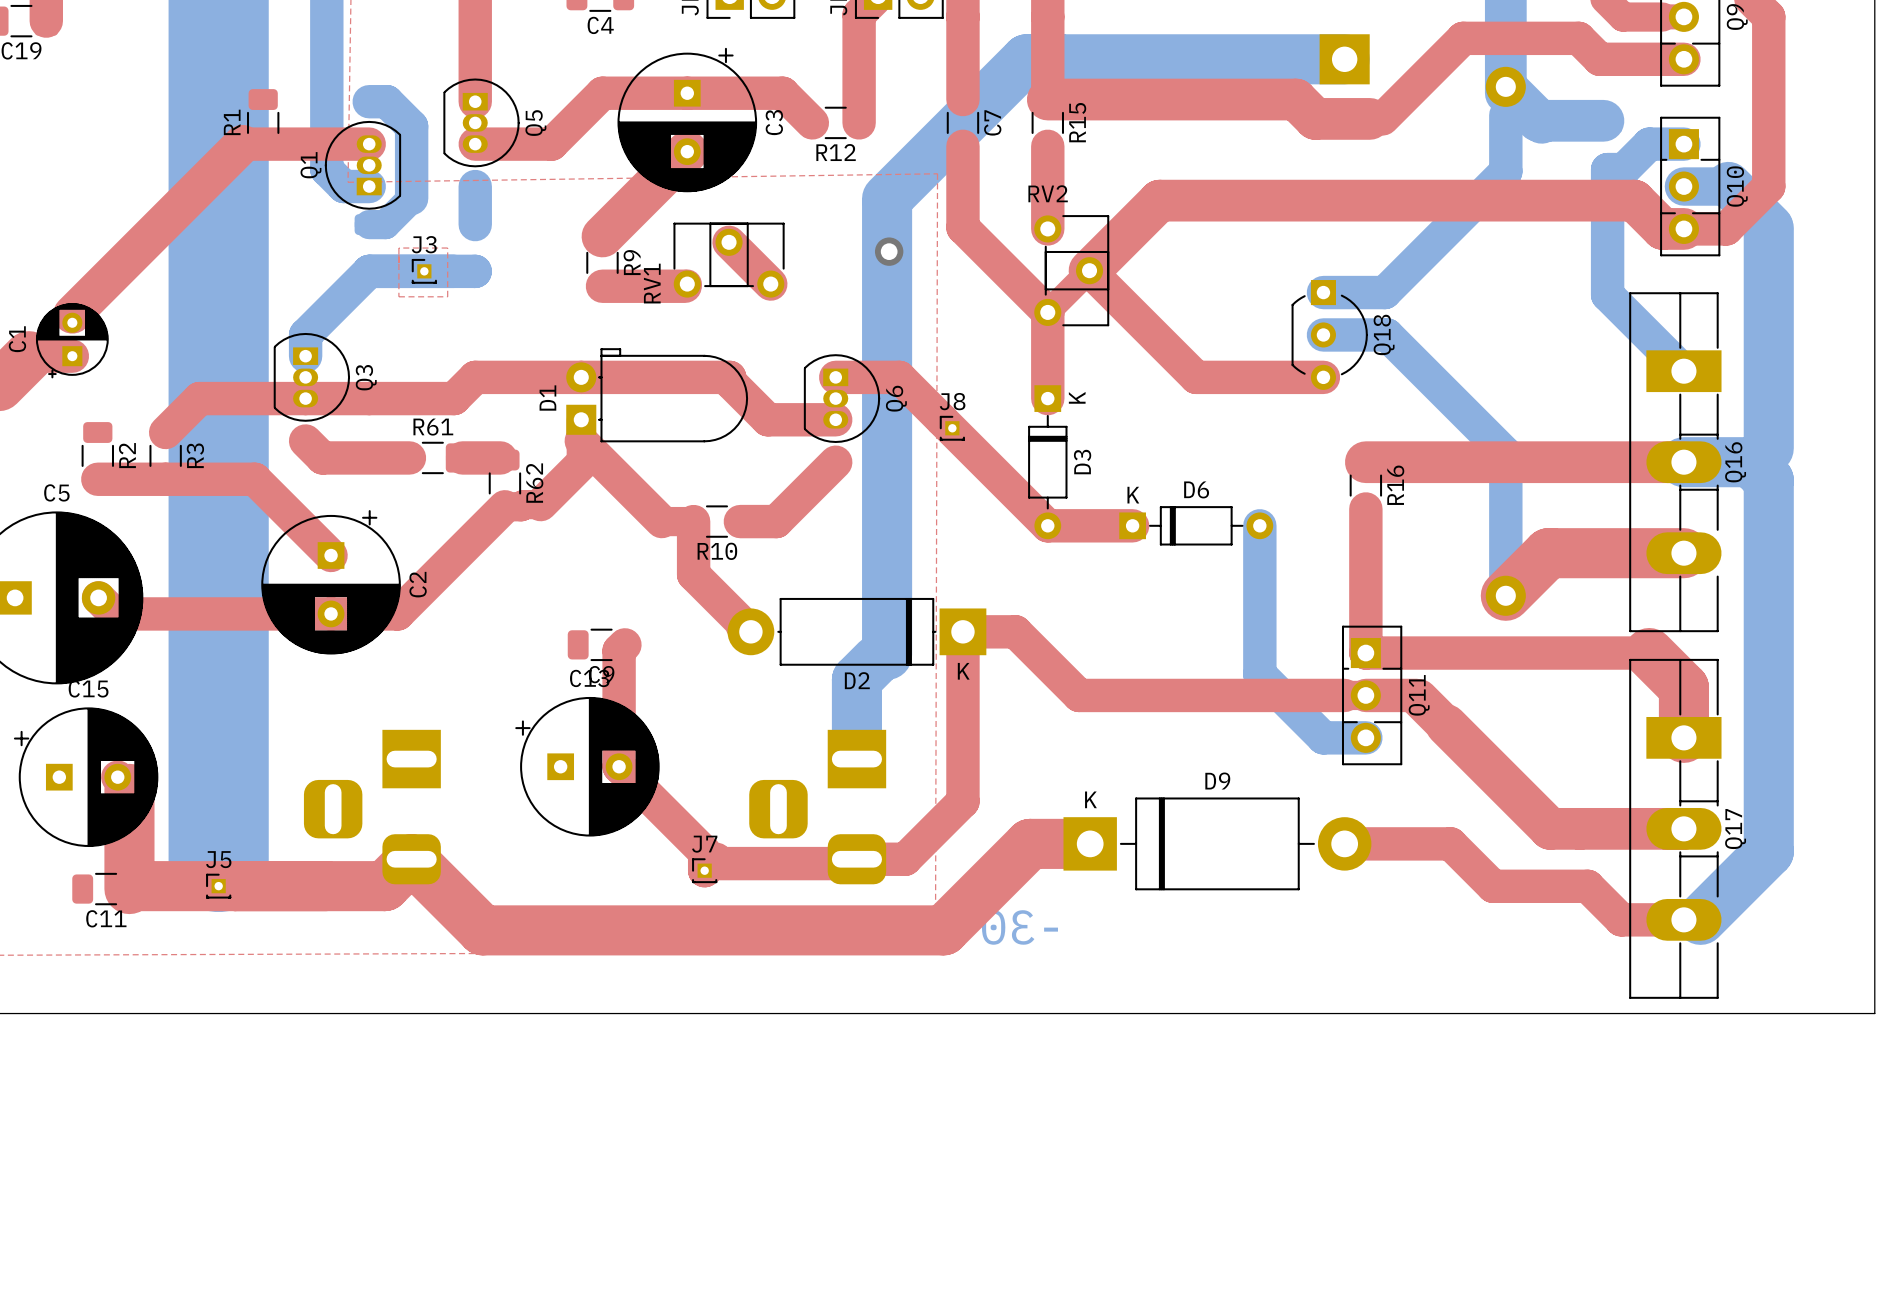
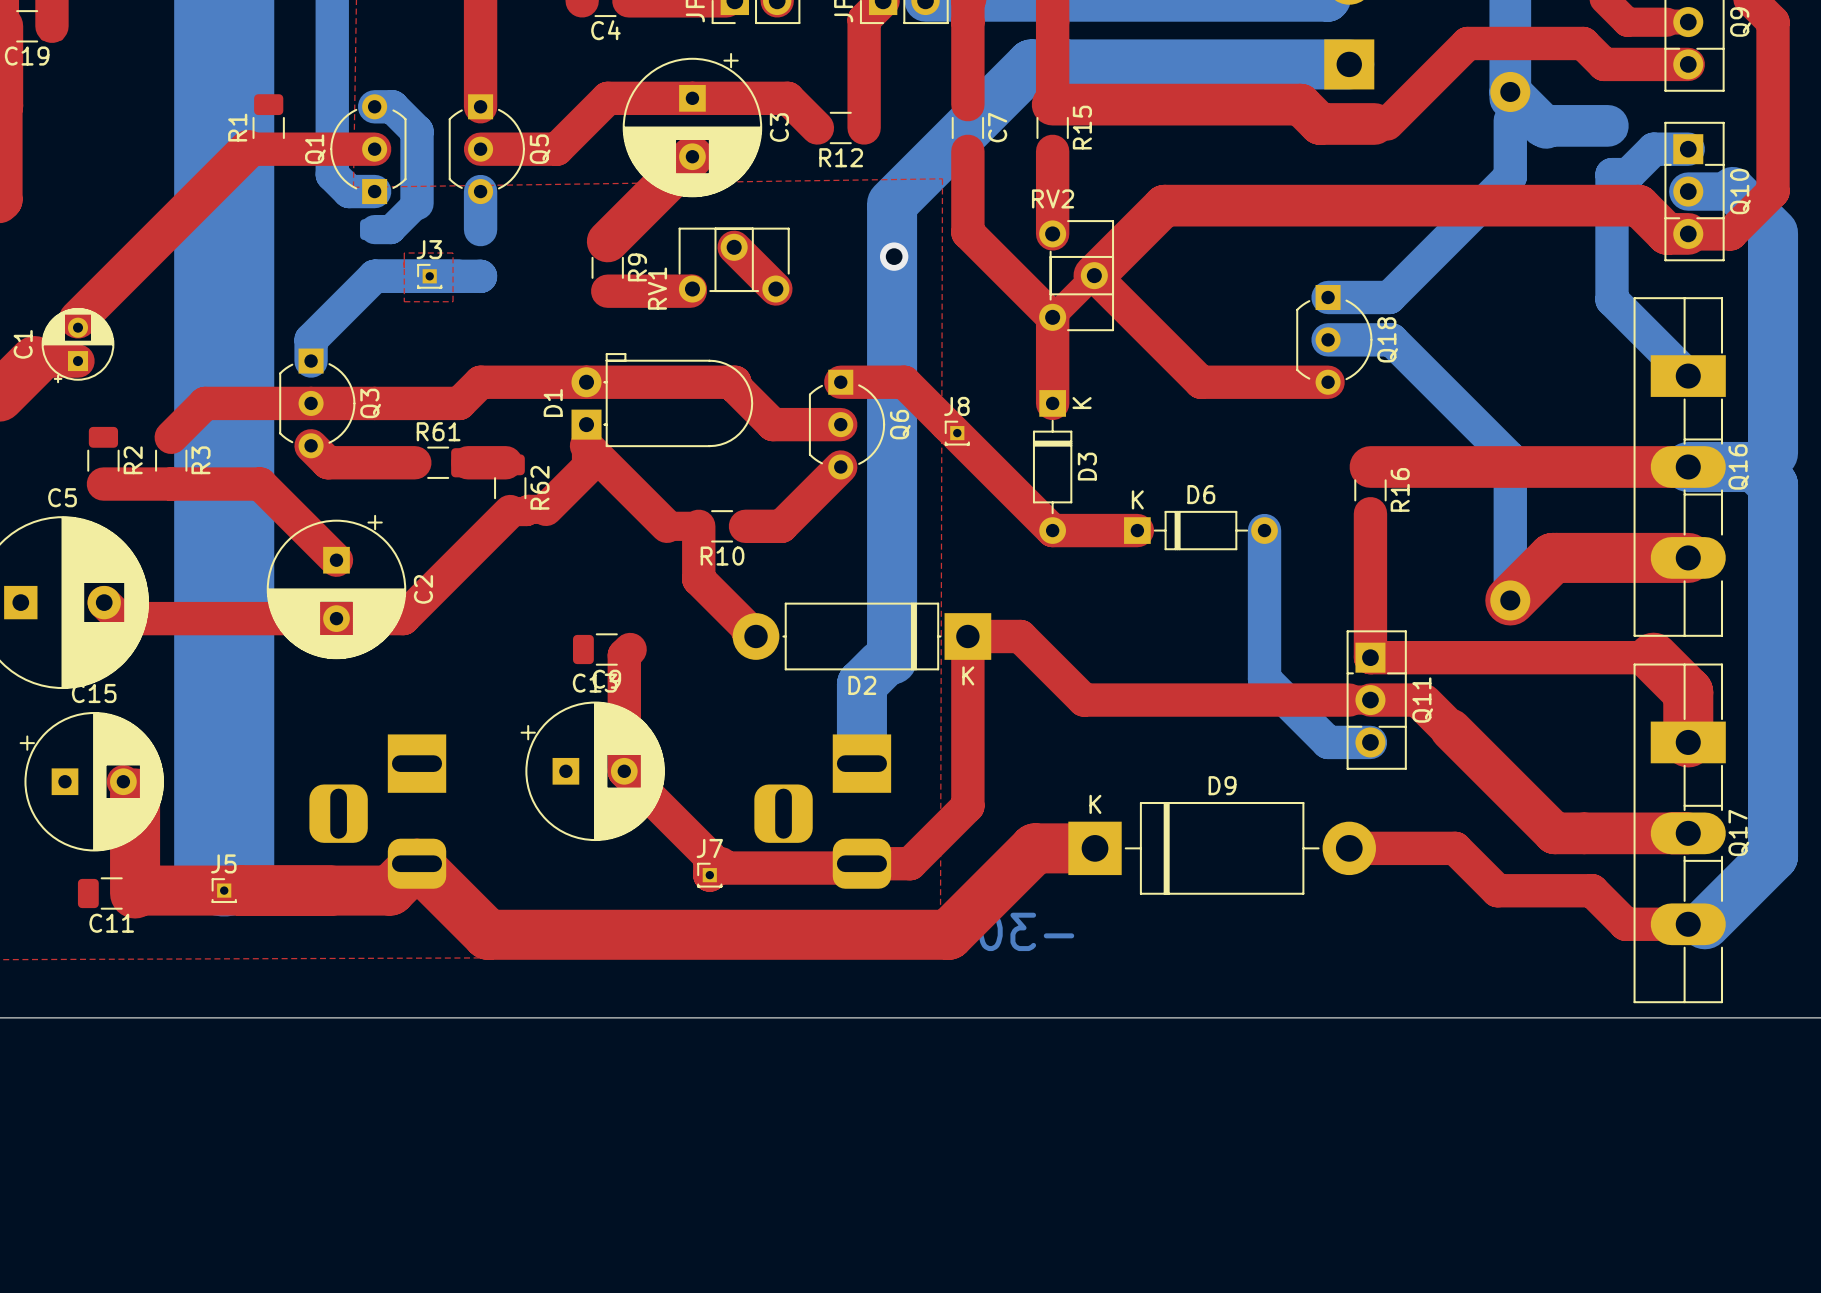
Q5 footprint: [443, 78, 520, 168] -> [448, 94, 525, 205]
Q1 footprint: [324, 120, 402, 210] -> [330, 94, 407, 205]
Q3 footprint: [273, 332, 351, 422] -> [279, 348, 356, 459]
Q6 footprint: [803, 354, 881, 443] -> [808, 369, 886, 480]

